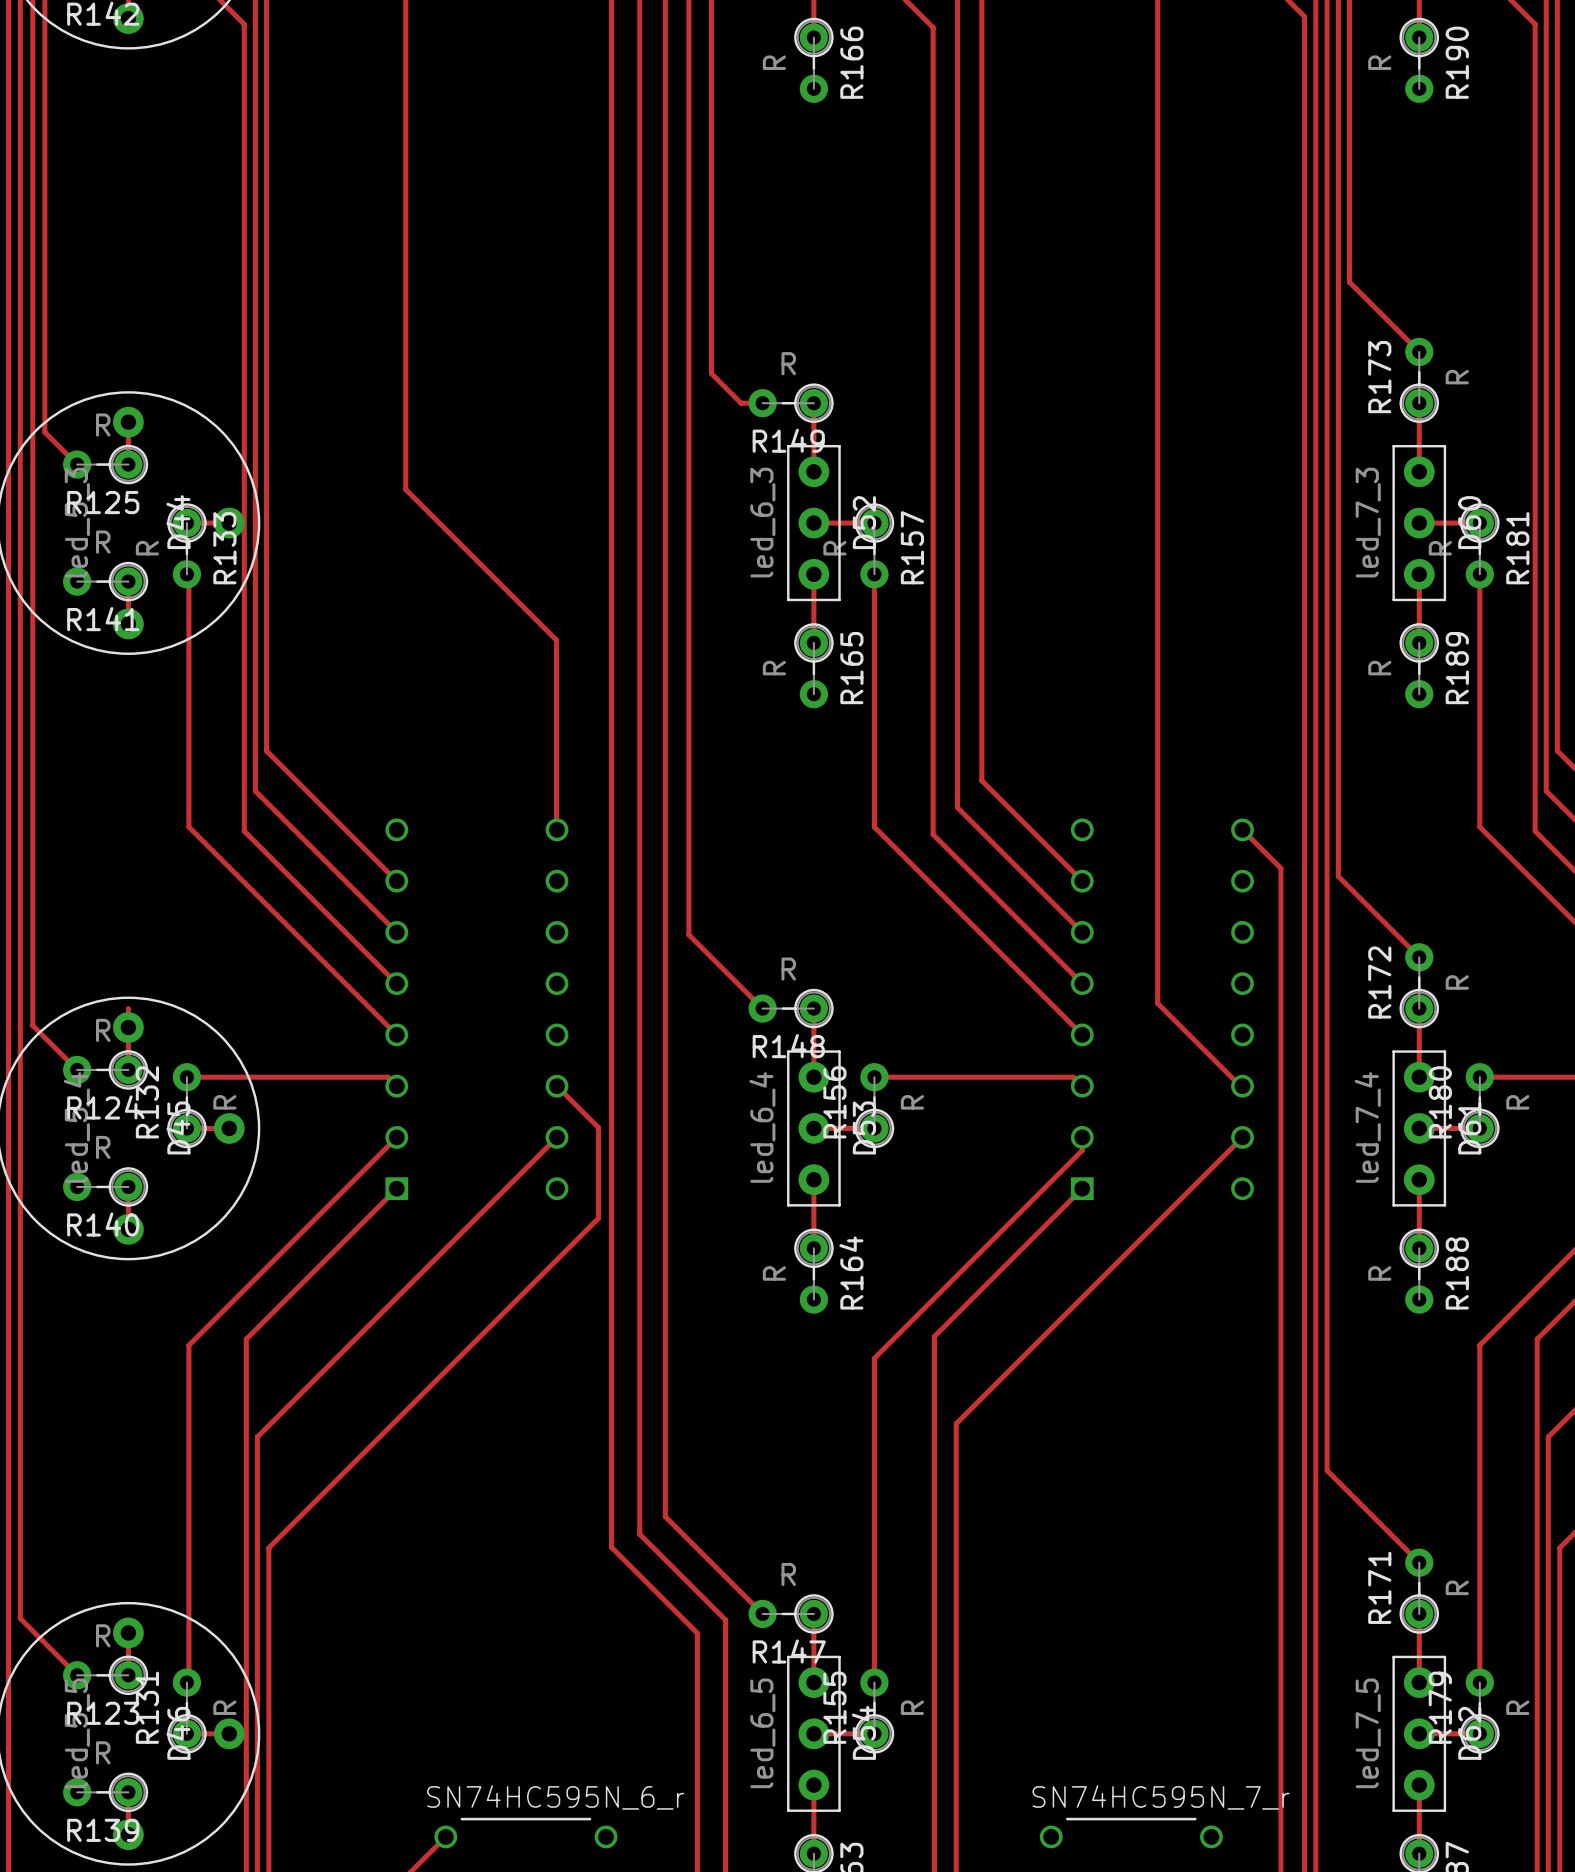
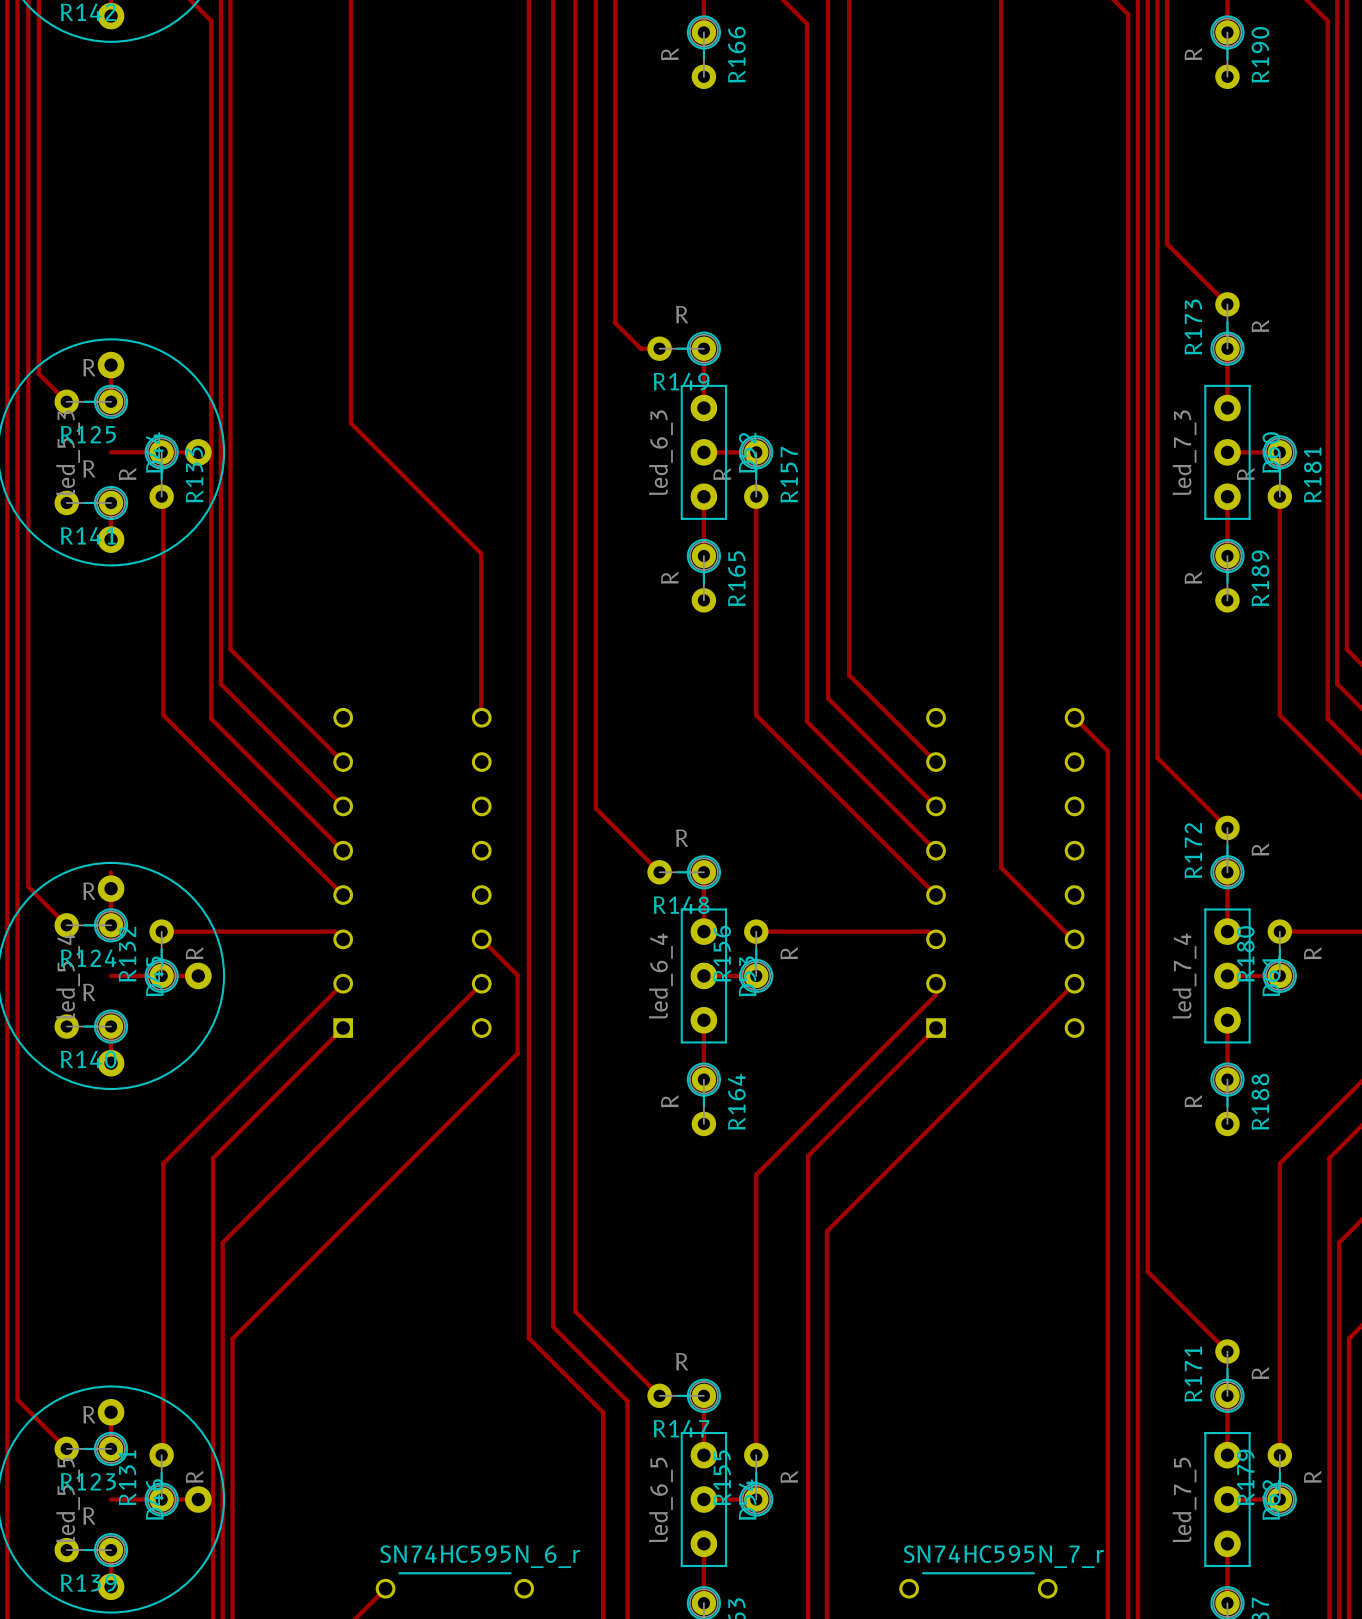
track: none -> (111, 452) (161, 452)
track: none -> (111, 975) (161, 975)
track: none -> (111, 1499) (161, 1499)

